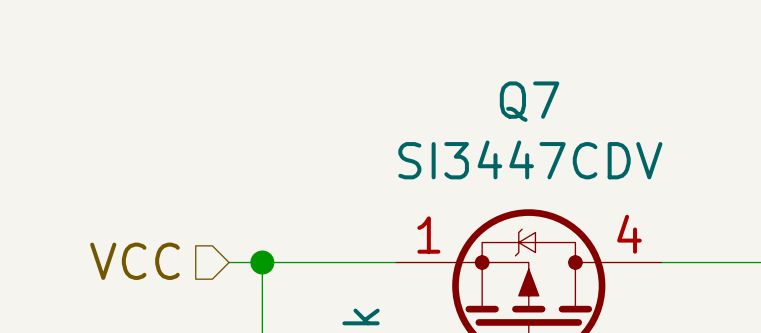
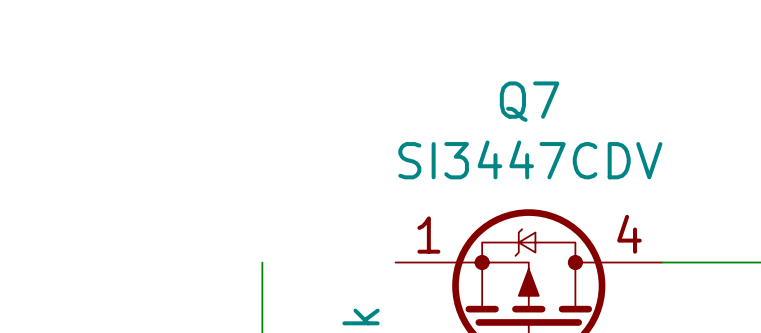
hierarchical label: VCC (134, 261) -> none
wire: (229, 262) (395, 262) -> none
junction: (262, 262) -> none

